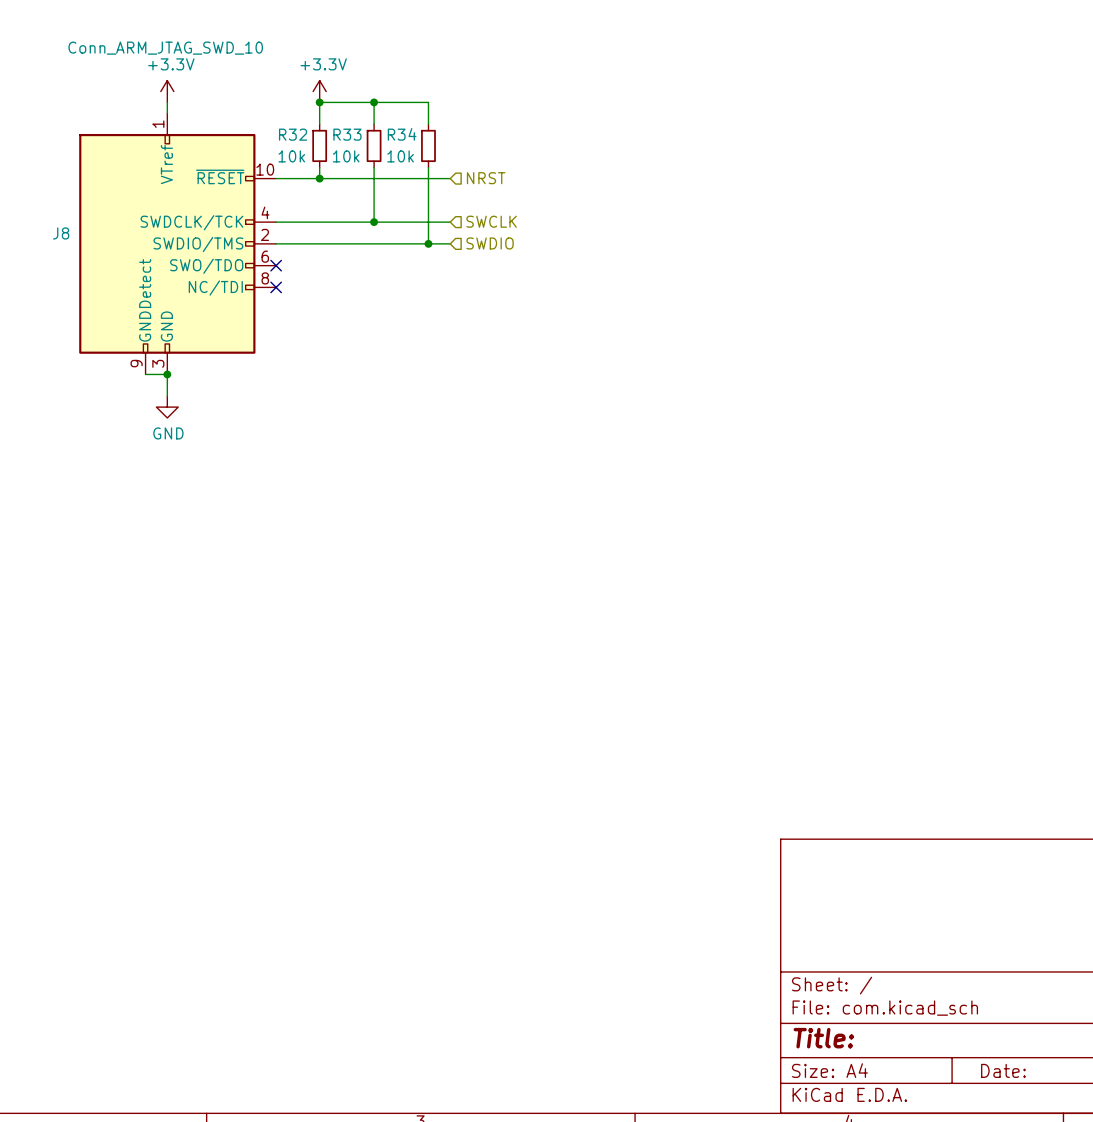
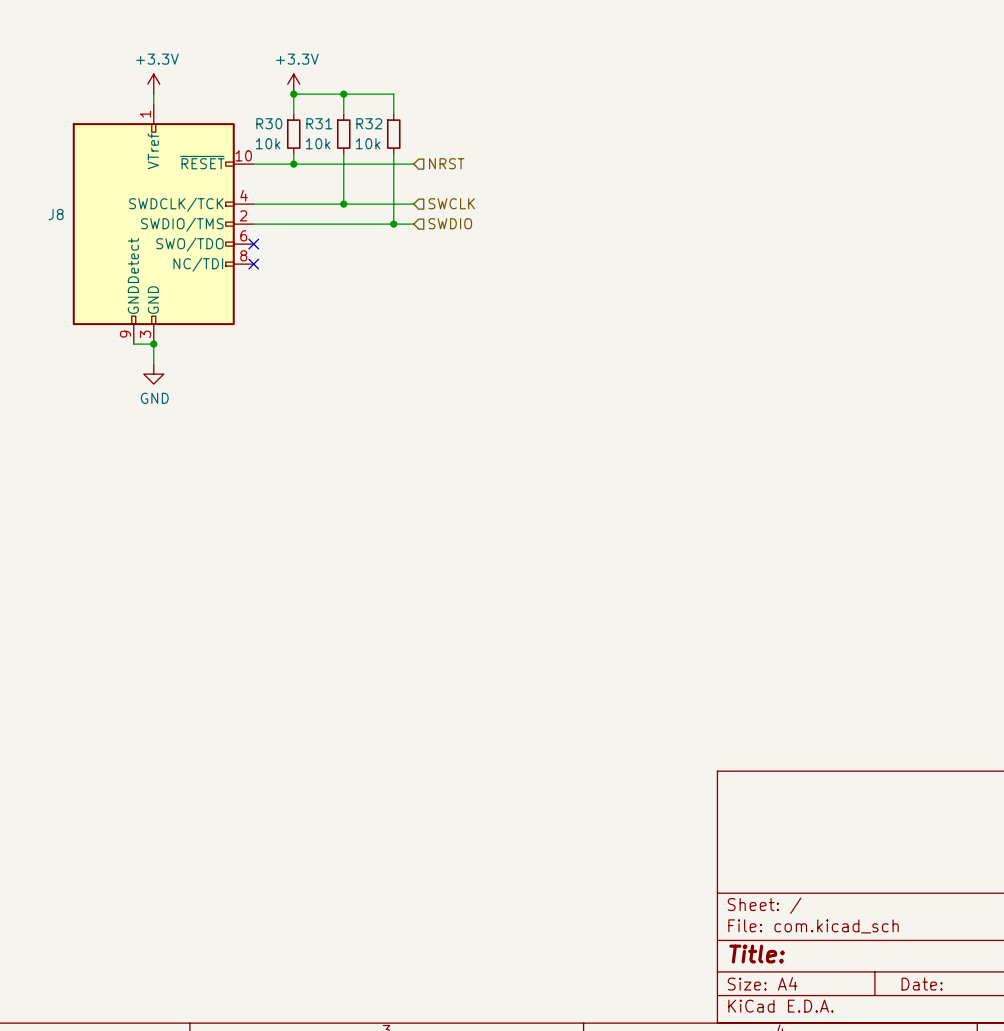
J8 value: Conn_ARM_JTAG_SWD_10 (165, 48) -> none
R32 name: R32 (293, 134) -> R30 (269, 123)
R33 name: R33 (347, 134) -> R31 (319, 123)
R34 name: R34 (402, 134) -> R32 (369, 123)

